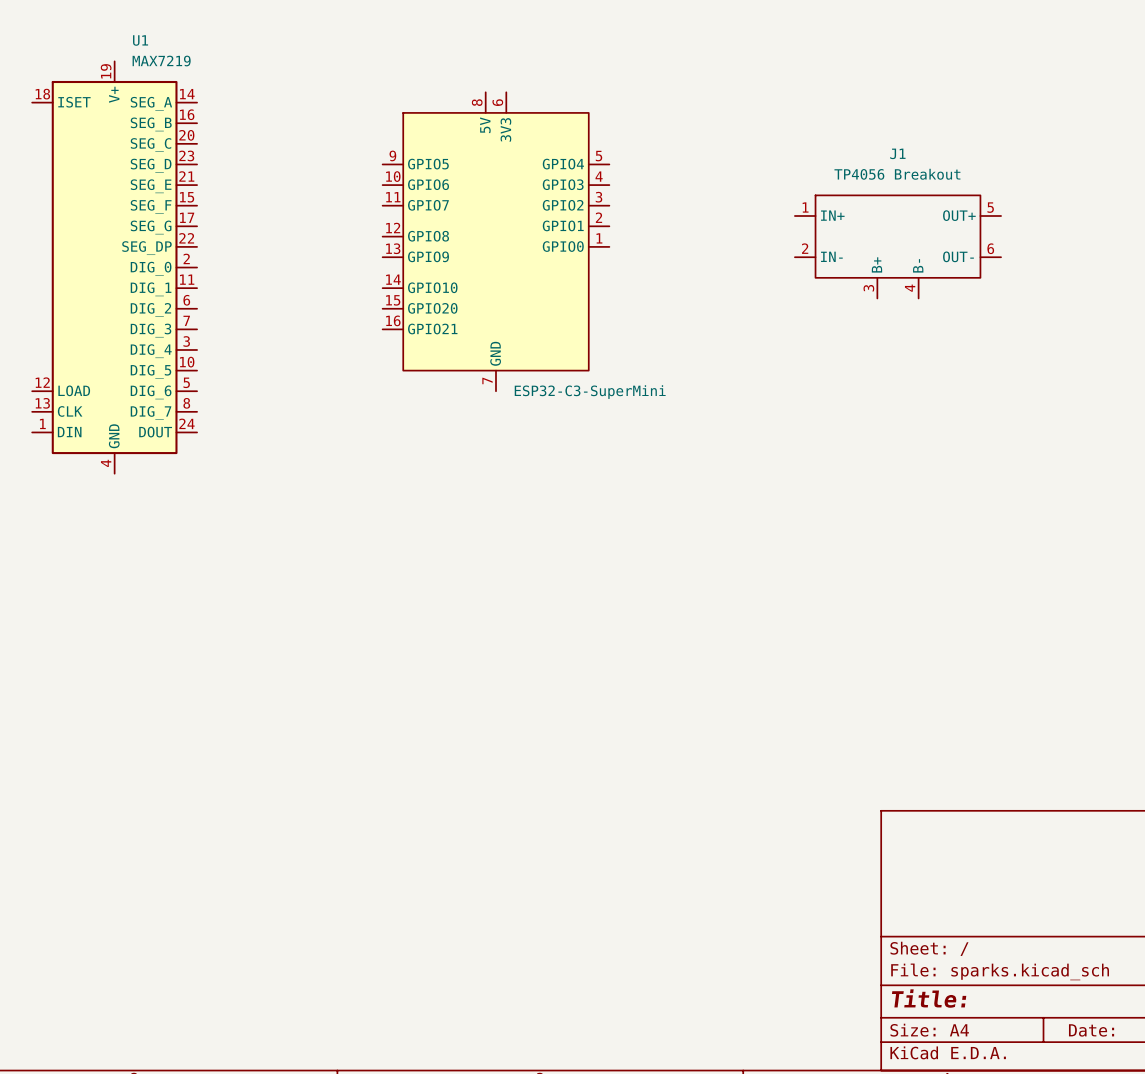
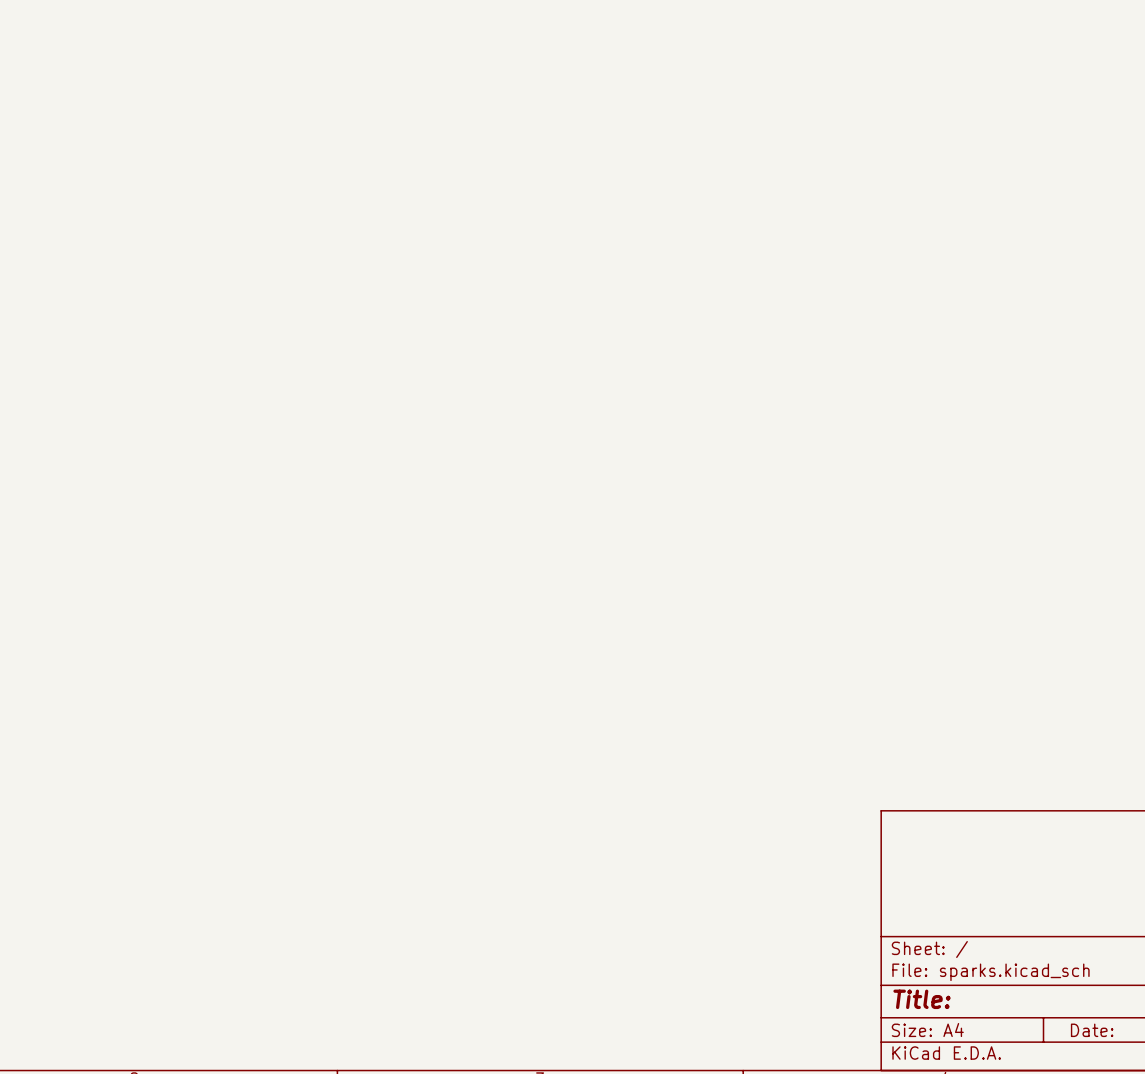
part: ESP32-C3-SuperMini (495, 241) -> none
J1: TP4056 Breakout (897, 246) -> none
U1: MAX7219 (114, 267) -> none

